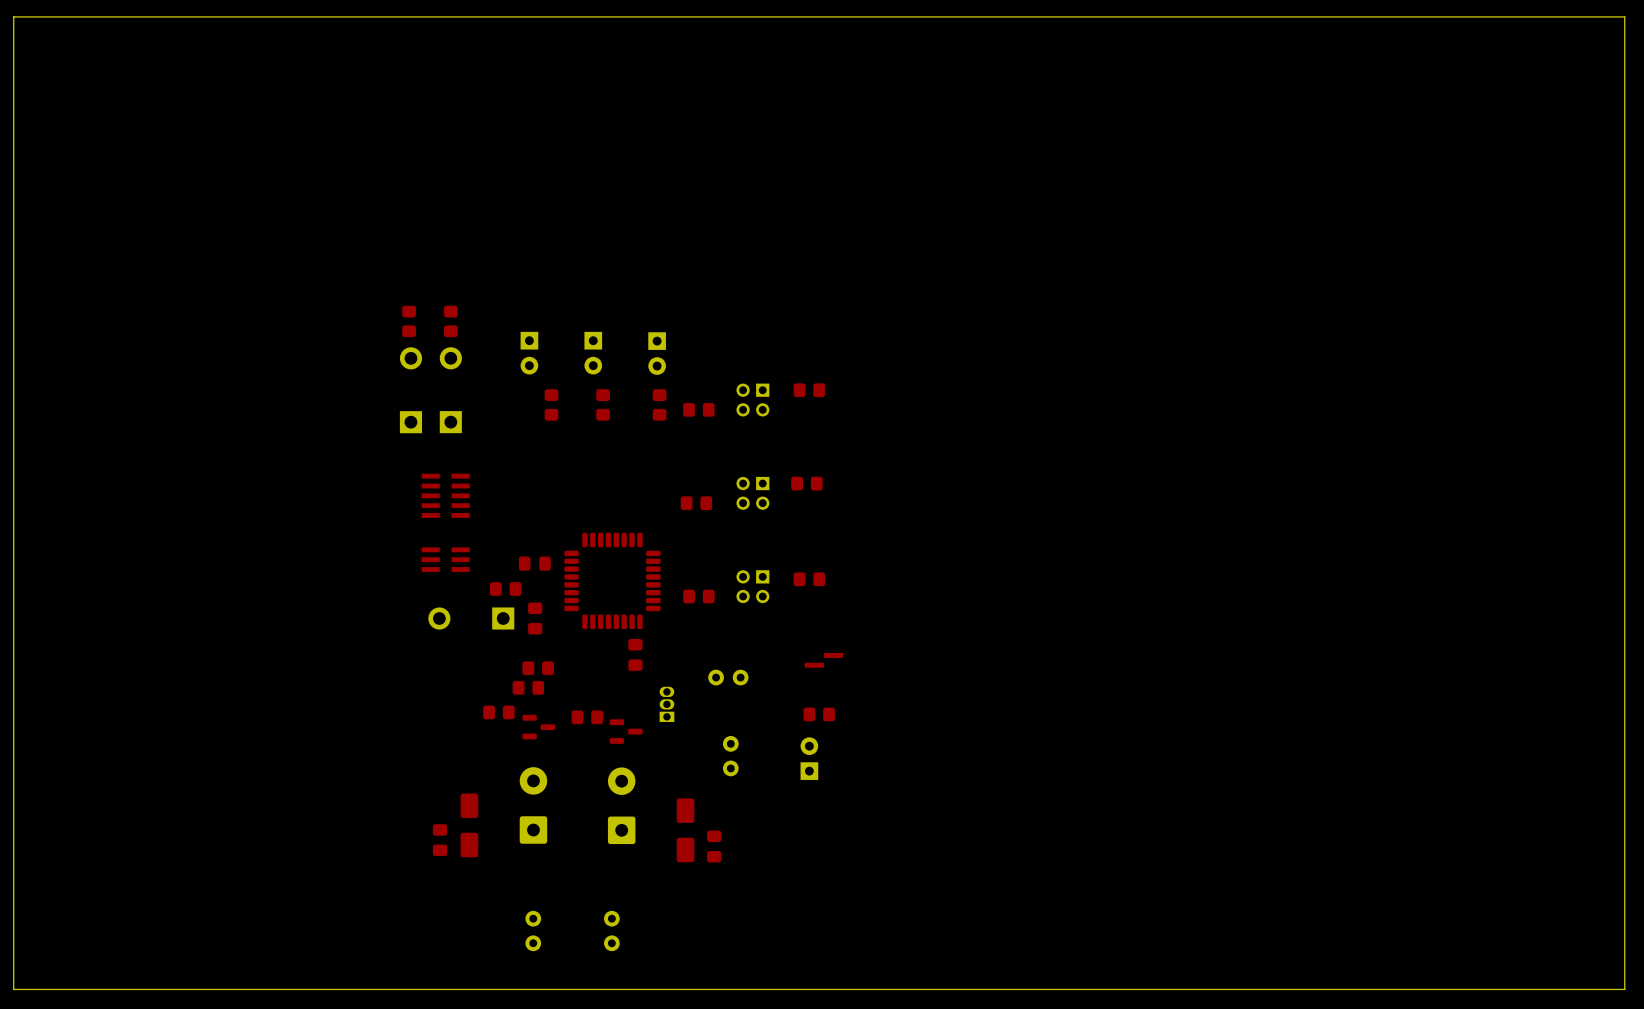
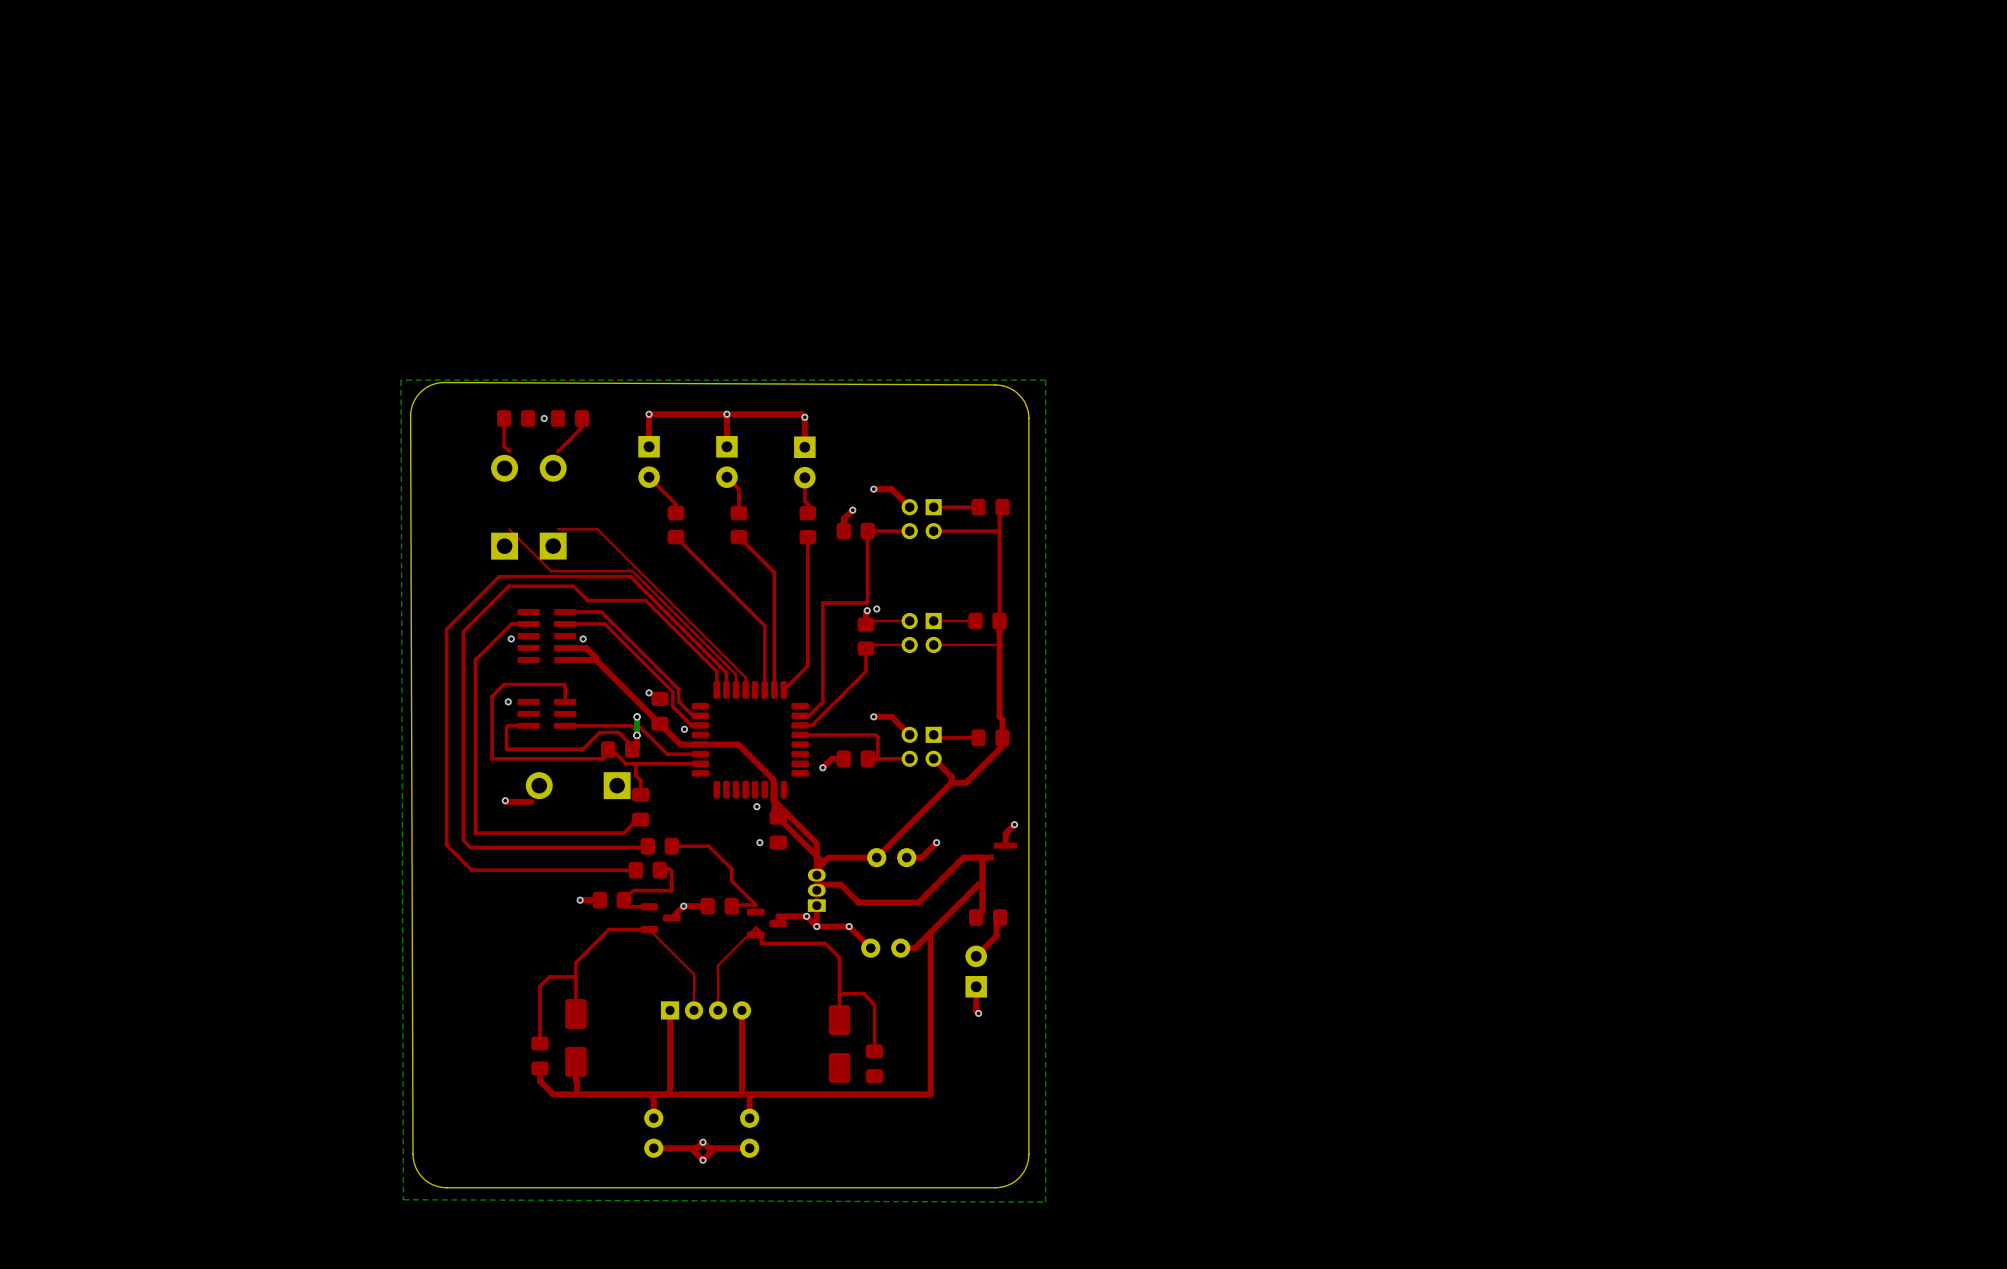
board edge: (1624, 16) (13, 16) (13, 989) (1624, 989) (1624, 16) -> none
bottom zone outline: none -> (1045, 380) (401, 380) (403, 1199) (1045, 1202) (1045, 380)
board edge: none -> (444, 382) (995, 384) (1009, 388) (1021, 397) (1027, 407) (1028, 418) (1028, 1154) (1025, 1168) (1016, 1180) (1006, 1185) (995, 1187) (446, 1187) (432, 1184) (420, 1175) (414, 1165) (413, 1154) (410, 416) (412, 405) (420, 392) (429, 385) (444, 382)
via: none -> (649, 414)
top track: none -> (723, 414) (726, 417) (726, 446)
via: none -> (726, 414)
via: none -> (804, 417)
top track: none -> (504, 418) (504, 446) (509, 451)
via: none -> (544, 418)
top track: none -> (581, 418) (581, 427) (558, 451)
part rotation: 0° (409, 321) -> 90° clockwise (516, 418)
part rotation: 0° (450, 321) -> 90° clockwise (569, 418)
top track: none -> (649, 446) (649, 414) (801, 414) (804, 417) (804, 447)
top track: none -> (649, 477) (676, 504) (676, 513)
top track: none -> (726, 477) (738, 489) (738, 513)
top track: none -> (804, 477) (804, 501) (813, 509) (807, 513)
top track: none -> (873, 489) (891, 489) (909, 507)
via: none -> (873, 489)
top track: none -> (978, 507) (933, 507)
top track: none -> (1002, 507) (999, 510) (999, 620)
top track: none -> (852, 510) (843, 519) (843, 531)
via: none -> (852, 510)
top track: none -> (509, 529) (551, 571) (632, 571) (735, 674) (735, 689)
top track: none -> (558, 529) (597, 529) (745, 677) (745, 689)
top track: none -> (909, 531) (867, 531) (867, 601) (865, 603) (822, 603) (822, 702) (809, 715) (800, 715)
top track: none -> (933, 531) (996, 531) (999, 534)
top track: none -> (676, 537) (764, 625) (764, 689)
top track: none -> (738, 537) (774, 572) (774, 689)
top track: none -> (807, 537) (807, 665) (783, 689)
via: none -> (876, 609)
top track: none -> (867, 610) (865, 624) (869, 620) (909, 620)
via: none -> (867, 610)
top track: none -> (566, 612) (601, 612) (678, 689) (678, 701) (692, 715) (700, 715)
top track: none -> (975, 620) (933, 620)
top track: none -> (999, 620) (999, 716) (1002, 719) (1002, 746) (966, 782) (951, 782)
top track: none -> (527, 623) (511, 623) (475, 660) (475, 833) (623, 833) (637, 819) (640, 819)
top track: none -> (566, 623) (604, 623) (672, 691) (672, 706) (691, 725) (700, 725)
via: none -> (511, 638)
via: none -> (583, 638)
part rotation: 0° (696, 503) -> 90° clockwise (865, 636)
top track: none -> (909, 644) (869, 644) (865, 648) (865, 671) (811, 725) (800, 725)
top track: none -> (999, 644) (933, 644)
top track: none -> (566, 647) (586, 647) (596, 659)
top track: none -> (596, 659) (567, 660)
top track: none -> (596, 659) (680, 744) (738, 744) (773, 779) (773, 799) (816, 843) (816, 869) (828, 857) (876, 857) (951, 782)
top track: none -> (716, 689) (716, 671) (645, 600) (587, 600) (573, 586) (508, 586) (463, 631) (463, 840) (470, 847) (647, 846)
top track: none -> (726, 689) (726, 672) (630, 576) (499, 576) (446, 629) (446, 845) (471, 870) (635, 870)
via: none -> (649, 692)
via: none -> (508, 701)
top track: none -> (565, 701) (563, 684) (504, 684) (492, 696) (492, 758) (602, 758) (611, 749) (625, 763) (700, 763)
bottom track: none -> (637, 716) (637, 735)
via: none -> (637, 716)
top track: none -> (873, 716) (891, 716) (909, 734)
via: none -> (873, 716)
part rotation: 0° (534, 563) -> 90° clockwise (659, 711)
top track: none -> (528, 725) (508, 725) (506, 727) (506, 749) (583, 749) (599, 732) (618, 732) (635, 749) (636, 735)
top track: none -> (565, 725) (631, 725) (640, 727) (667, 754) (700, 754)
via: none -> (684, 729)
top track: none -> (800, 734) (875, 734) (877, 737) (877, 758)
top track: none -> (933, 734) (936, 737) (978, 737)
via: none -> (636, 735)
top track: none -> (839, 758) (831, 758) (822, 767)
top track: none -> (909, 758) (863, 758)
top track: none -> (933, 758) (951, 776) (951, 782)
top track: none -> (635, 763) (635, 775) (640, 780) (640, 789)
via: none -> (822, 767)
part position: (535, 618) -> (640, 807)
top track: none -> (774, 789) (774, 813) (821, 860) (821, 865)
top track: none -> (505, 800) (531, 801)
via: none -> (505, 800)
via: none -> (756, 806)
top track: none -> (1014, 824) (1005, 833) (1005, 845)
via: none -> (1014, 824)
part position: (823, 660) -> (993, 851)
via: none -> (759, 842)
top track: none -> (936, 842) (921, 857) (906, 857)
via: none -> (936, 842)
top track: none -> (671, 846) (708, 846) (731, 869) (731, 880) (755, 904) (732, 904) (731, 906) (737, 912)
top track: none -> (659, 870) (669, 869) (671, 871) (671, 890) (633, 890) (623, 900) (630, 906) (649, 906)
top track: none -> (816, 884) (840, 884) (858, 902) (918, 902) (963, 857) (982, 857) (982, 911) (976, 917)
top track: none -> (982, 884) (978, 884) (915, 948) (900, 948)
via: none -> (580, 900)
top track: none -> (599, 900) (580, 900)
top track: none -> (816, 899) (816, 926)
part position: (819, 714) -> (988, 917)
via: none -> (683, 906)
top track: none -> (707, 906) (683, 906) (671, 918)
top track: none -> (778, 916) (806, 916) (816, 926)
via: none -> (806, 916)
top track: none -> (1000, 917) (1000, 922) (996, 926) (996, 935) (976, 956)
top track: none -> (816, 926) (849, 926) (870, 948)
via: none -> (816, 926)
via: none -> (849, 926)
top track: none -> (930, 932) (930, 1094) (553, 1094) (539, 1081) (539, 1068)
part rotation: 0° (730, 756) -> 90° clockwise (885, 948)
part position: (809, 758) -> (976, 971)
top track: none -> (575, 976) (549, 976) (539, 986) (539, 1043)
top track: none -> (976, 986) (976, 1011) (978, 1013)
top track: none -> (839, 993) (863, 993) (874, 1004) (874, 1051)
top track: none -> (670, 1010) (670, 1091) (667, 1094)
top track: none -> (694, 1010) (694, 974) (649, 929) (608, 929) (575, 962) (575, 1014)
part: none -> (705, 1010)
top track: none -> (717, 1010) (717, 965) (755, 927) (761, 933) (761, 943) (825, 943) (839, 957) (839, 1020)
top track: none -> (741, 1010) (741, 1094)
part: (533, 805) -> none
part: (621, 805) -> none
via: none -> (978, 1013)
top track: none -> (575, 1061) (577, 1094)
top track: none -> (649, 1094) (653, 1099) (653, 1118)
top track: none -> (750, 1094) (749, 1118)
via: none -> (702, 1142)
top track: none -> (714, 1148) (702, 1160) (691, 1148)
top track: none -> (749, 1148) (708, 1148) (702, 1142) (697, 1148) (653, 1148)
via: none -> (702, 1160)
part position: (533, 930) -> (653, 1133)
part position: (611, 930) -> (749, 1133)

